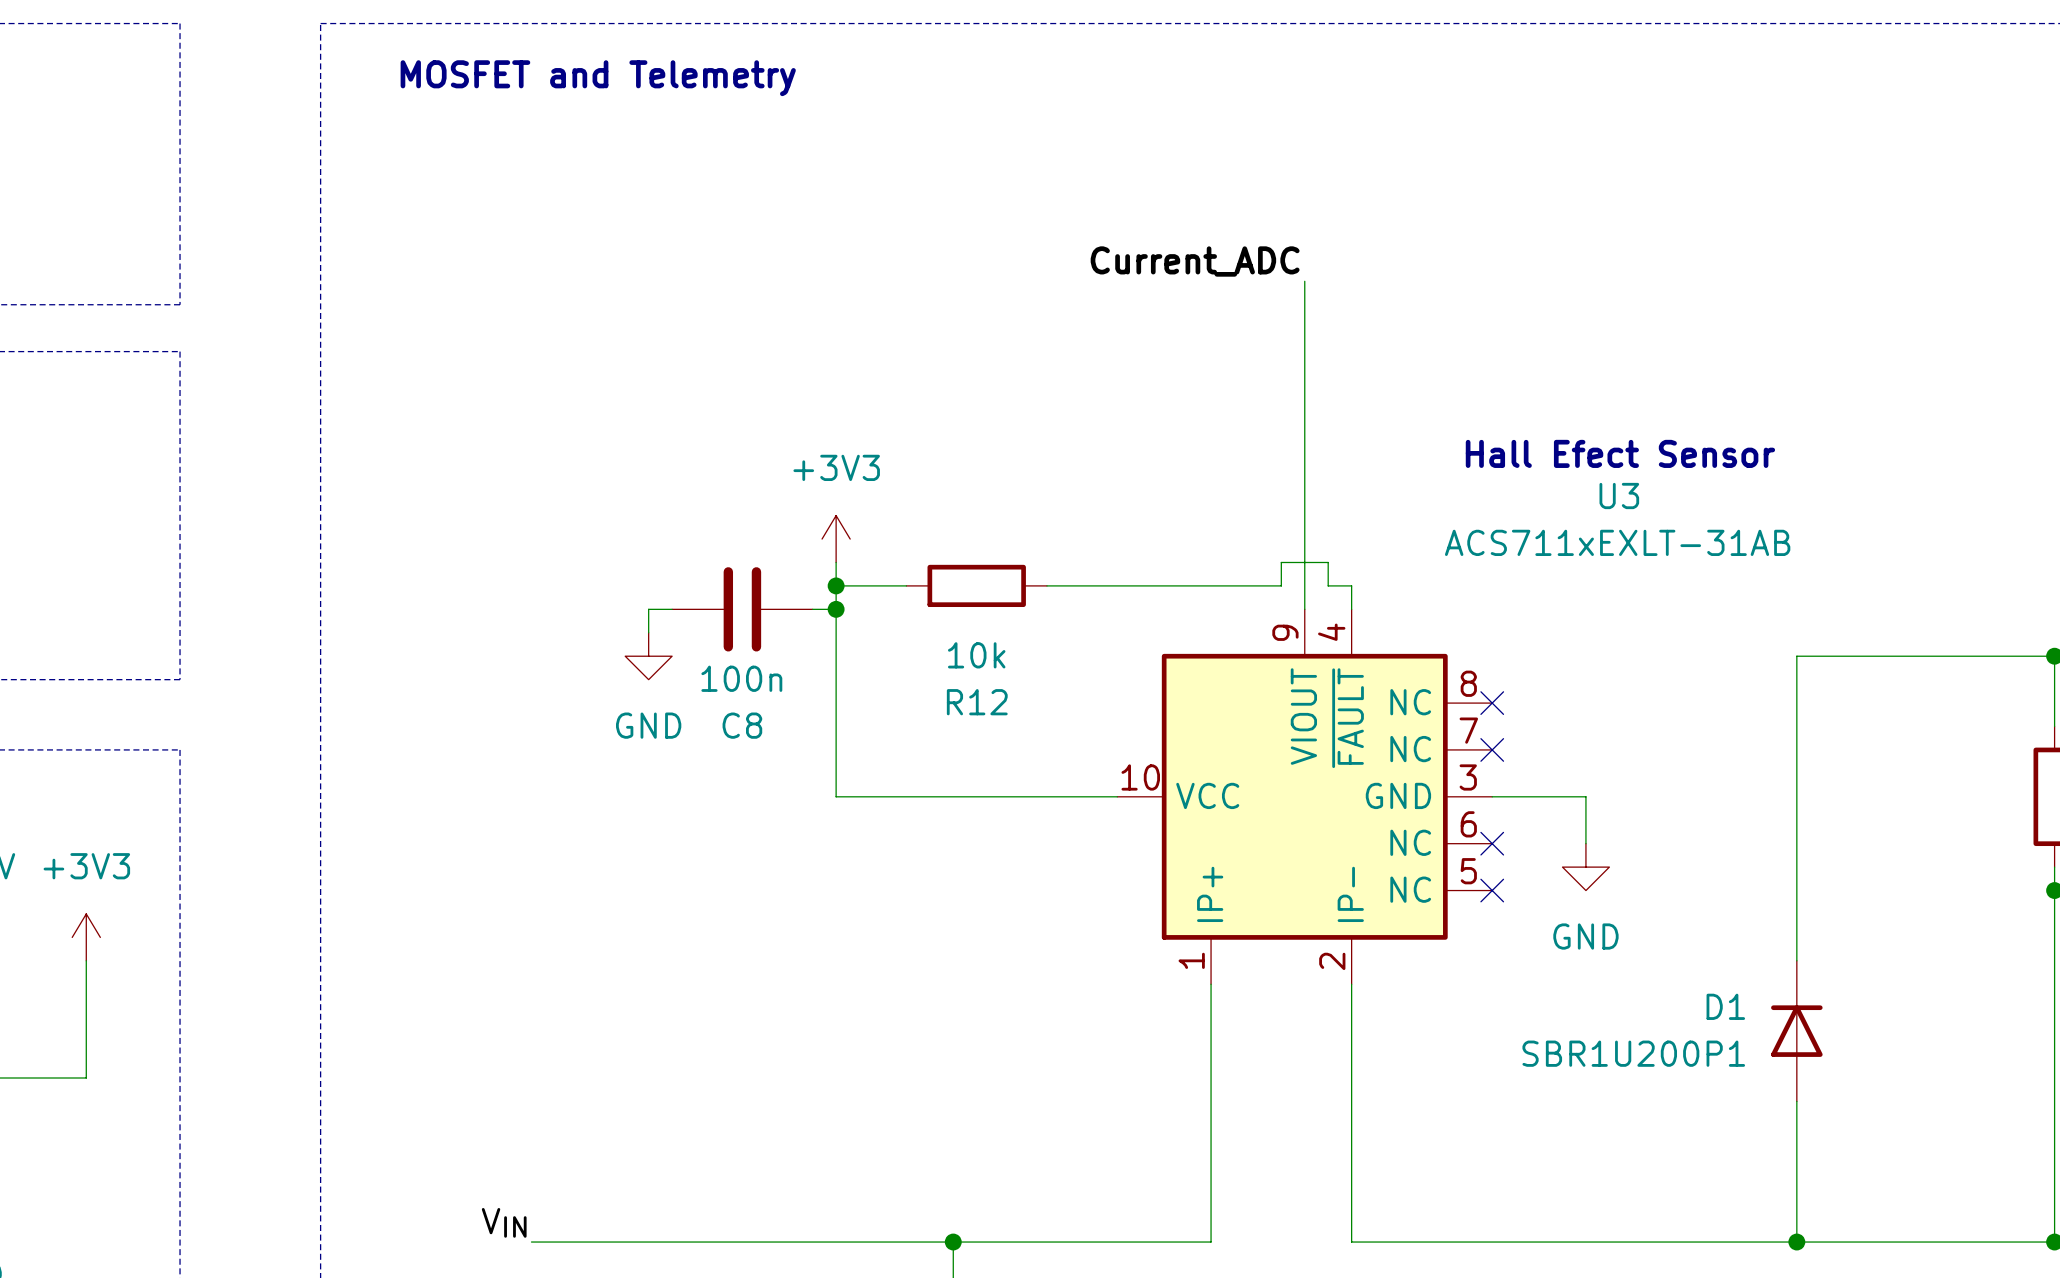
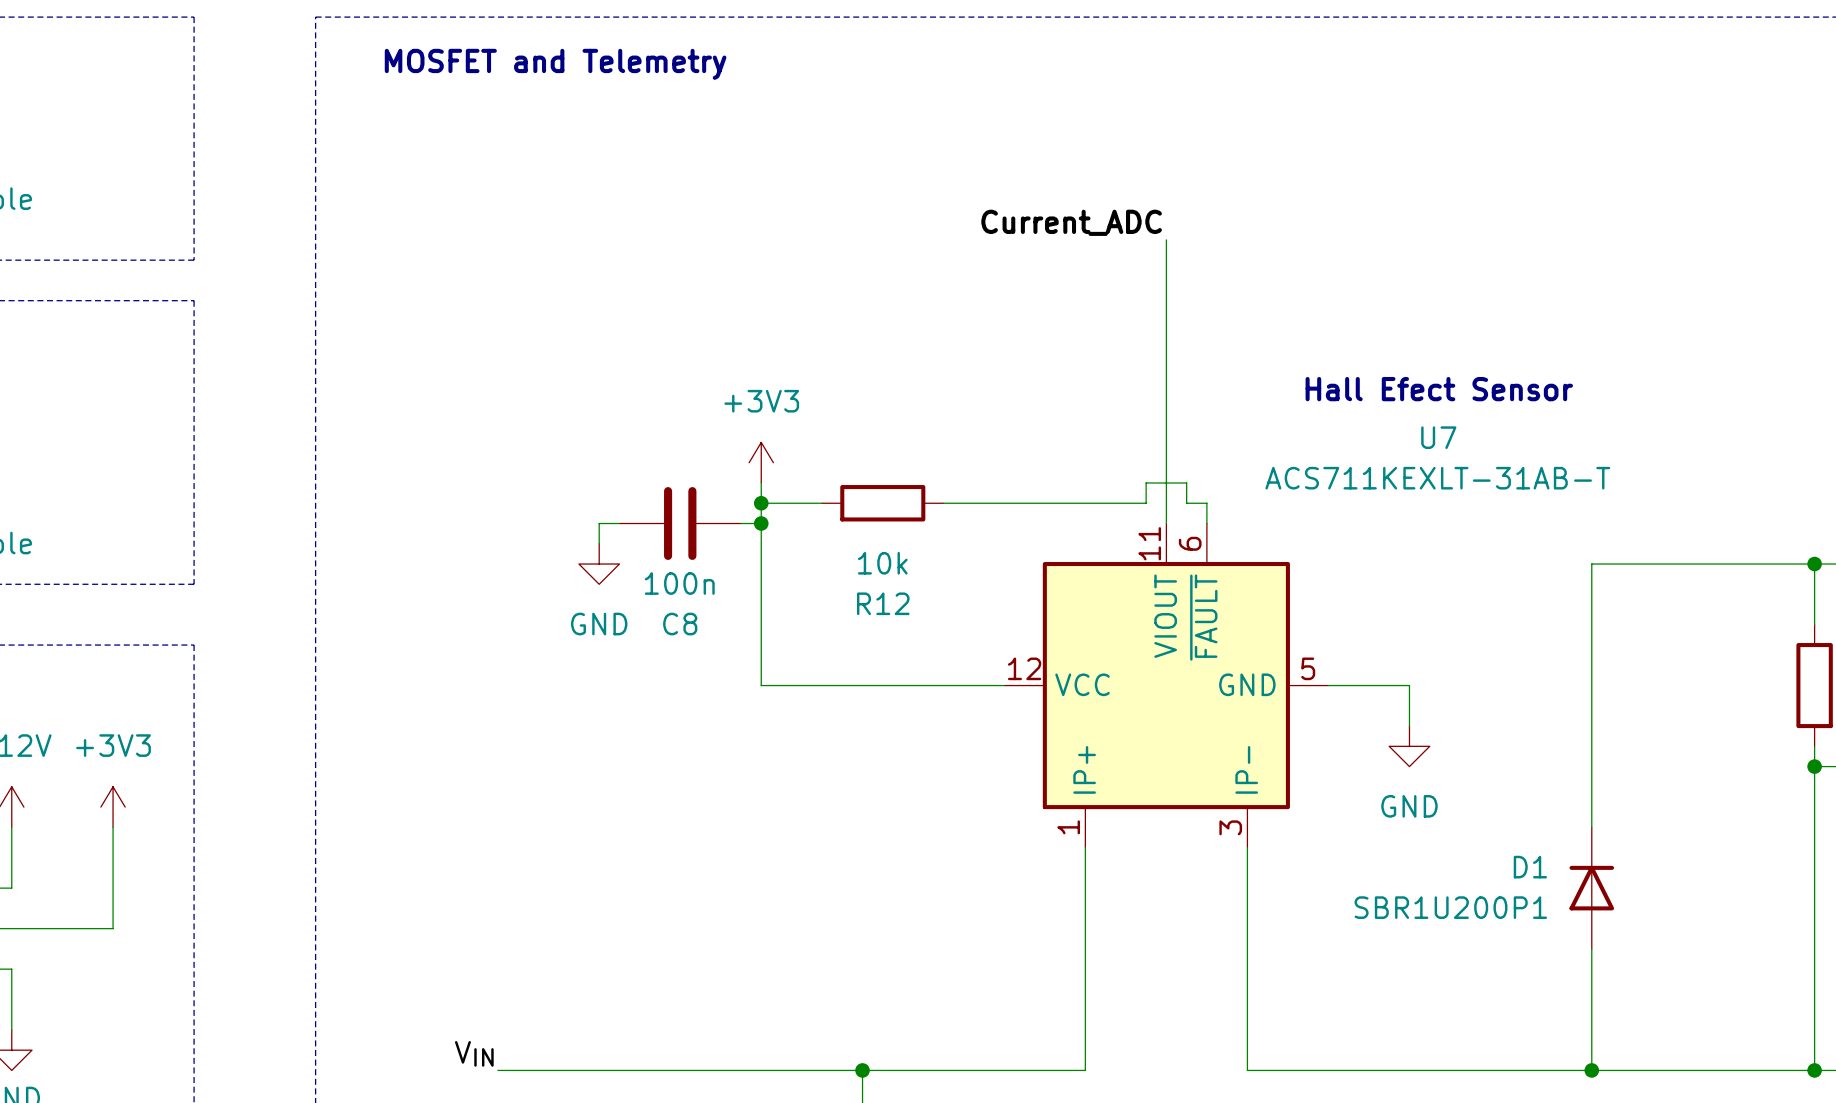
no-connect mark: (1492, 703) -> none
no-connect mark: (1492, 749) -> none
U3: ACS711xEXLT-31AB (1304, 796) -> none
U7: none -> ACS711KEXLT-31AB-T (1166, 685)
no-connect mark: (1492, 843) -> none
no-connect mark: (1492, 890) -> none
wire: (1351, 984) (1351, 1242) (1398, 1242) -> (1247, 847) (1247, 1070)

